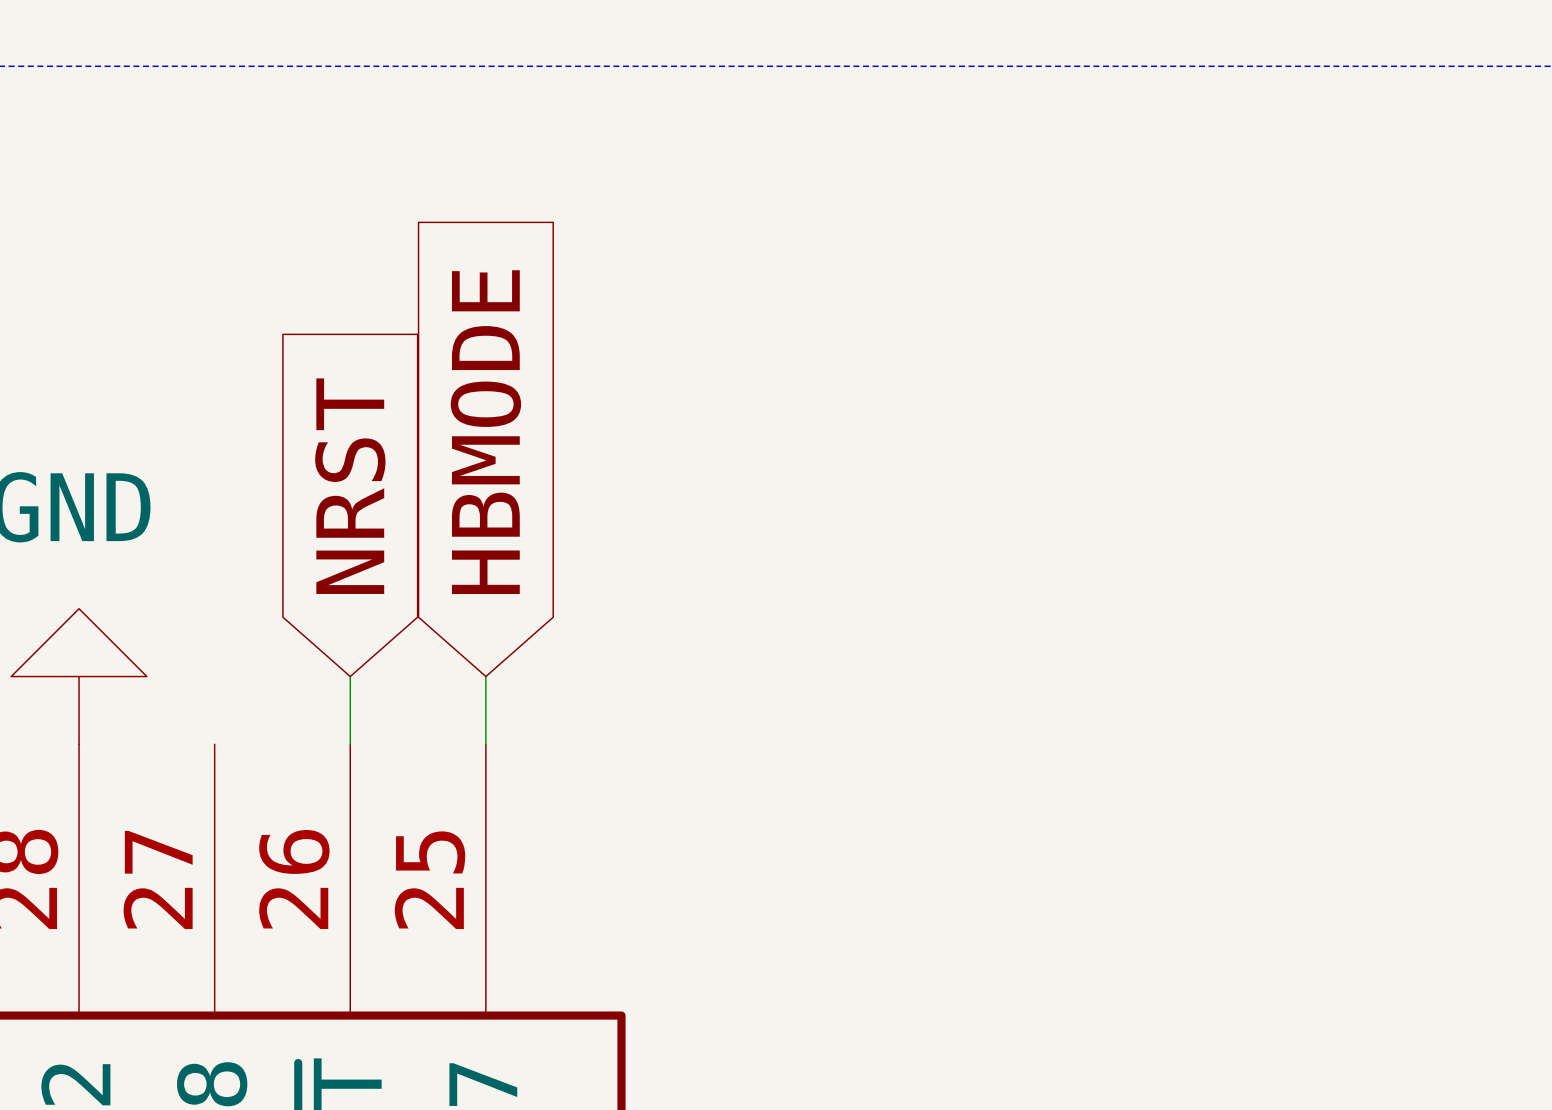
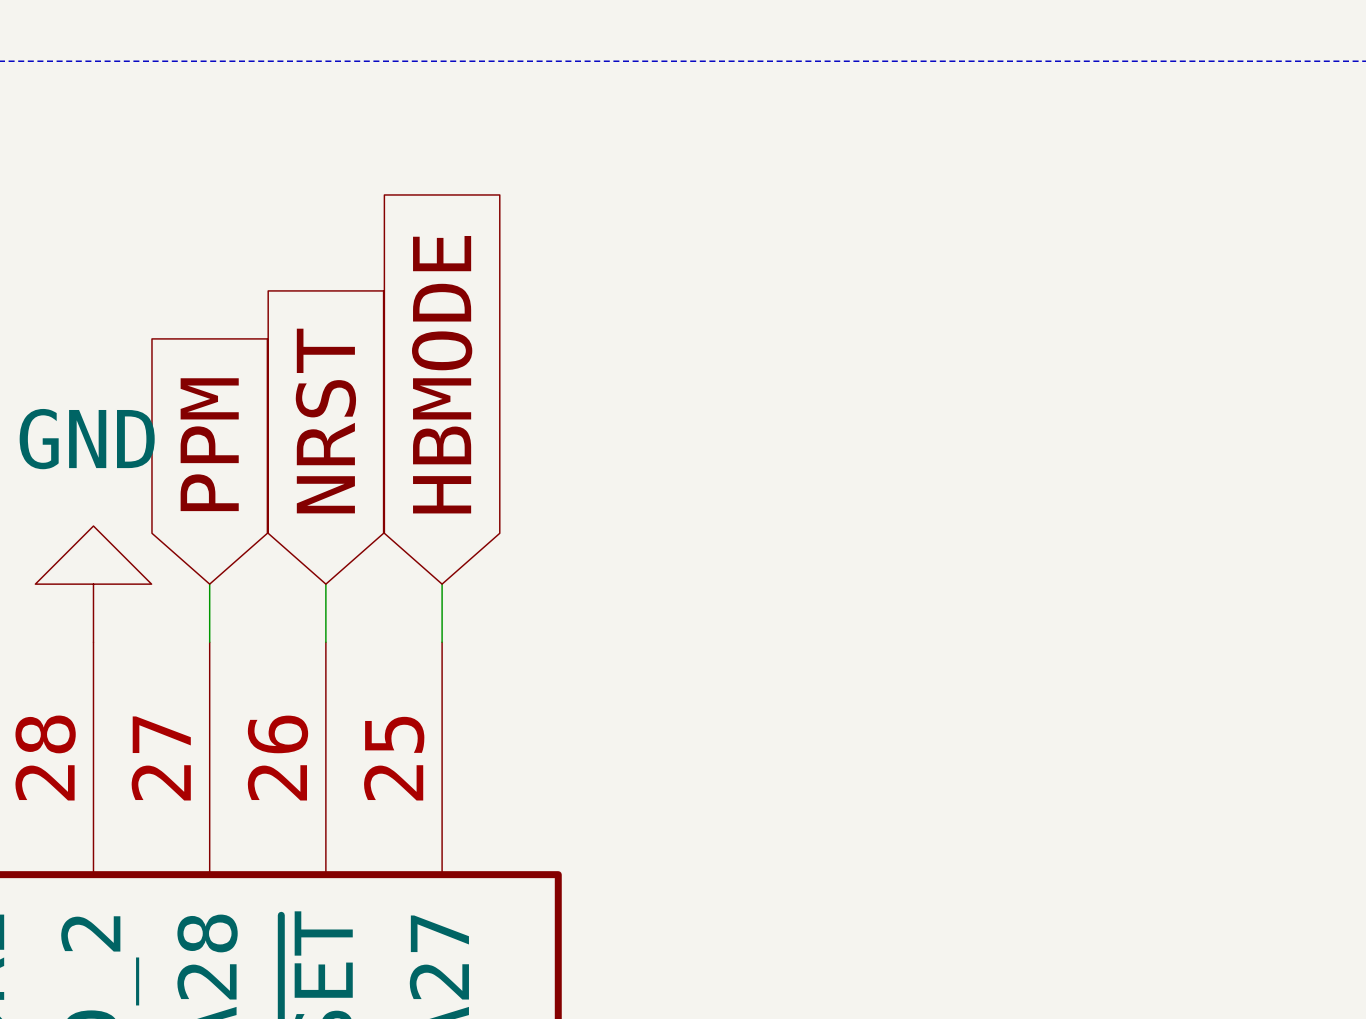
global label: none -> PPM (209, 444)
wire: none -> (209, 584) (209, 642)

